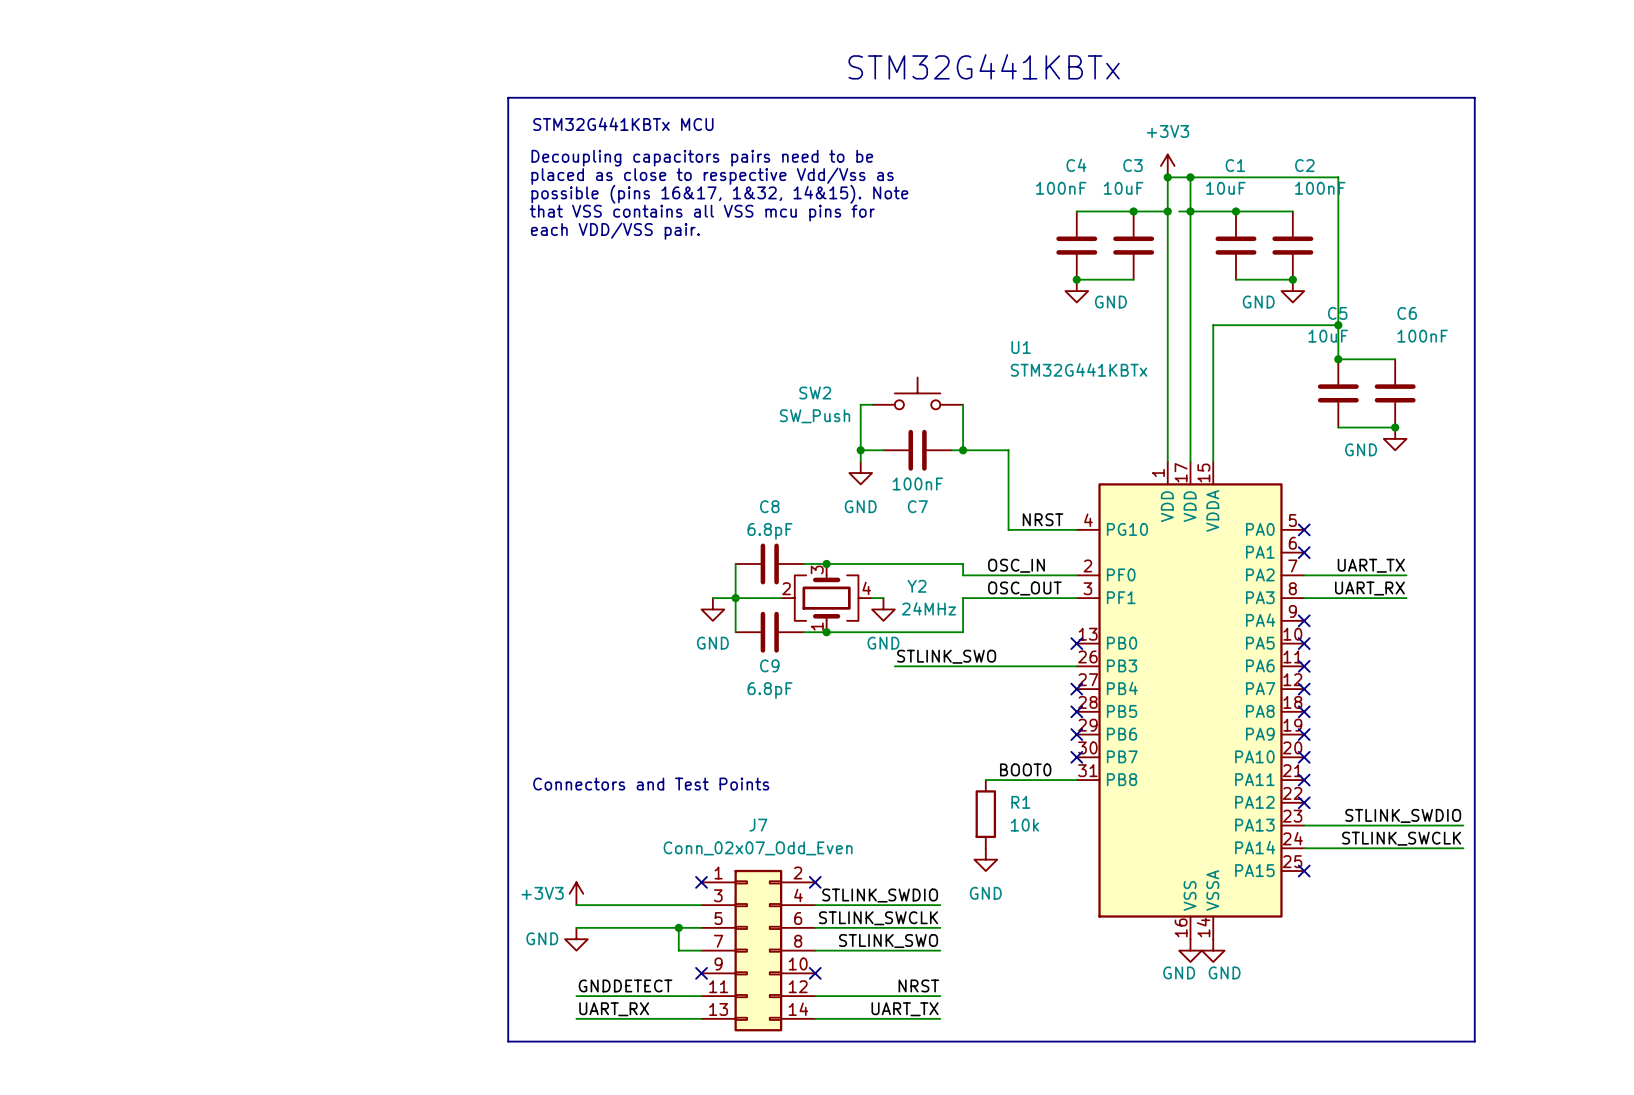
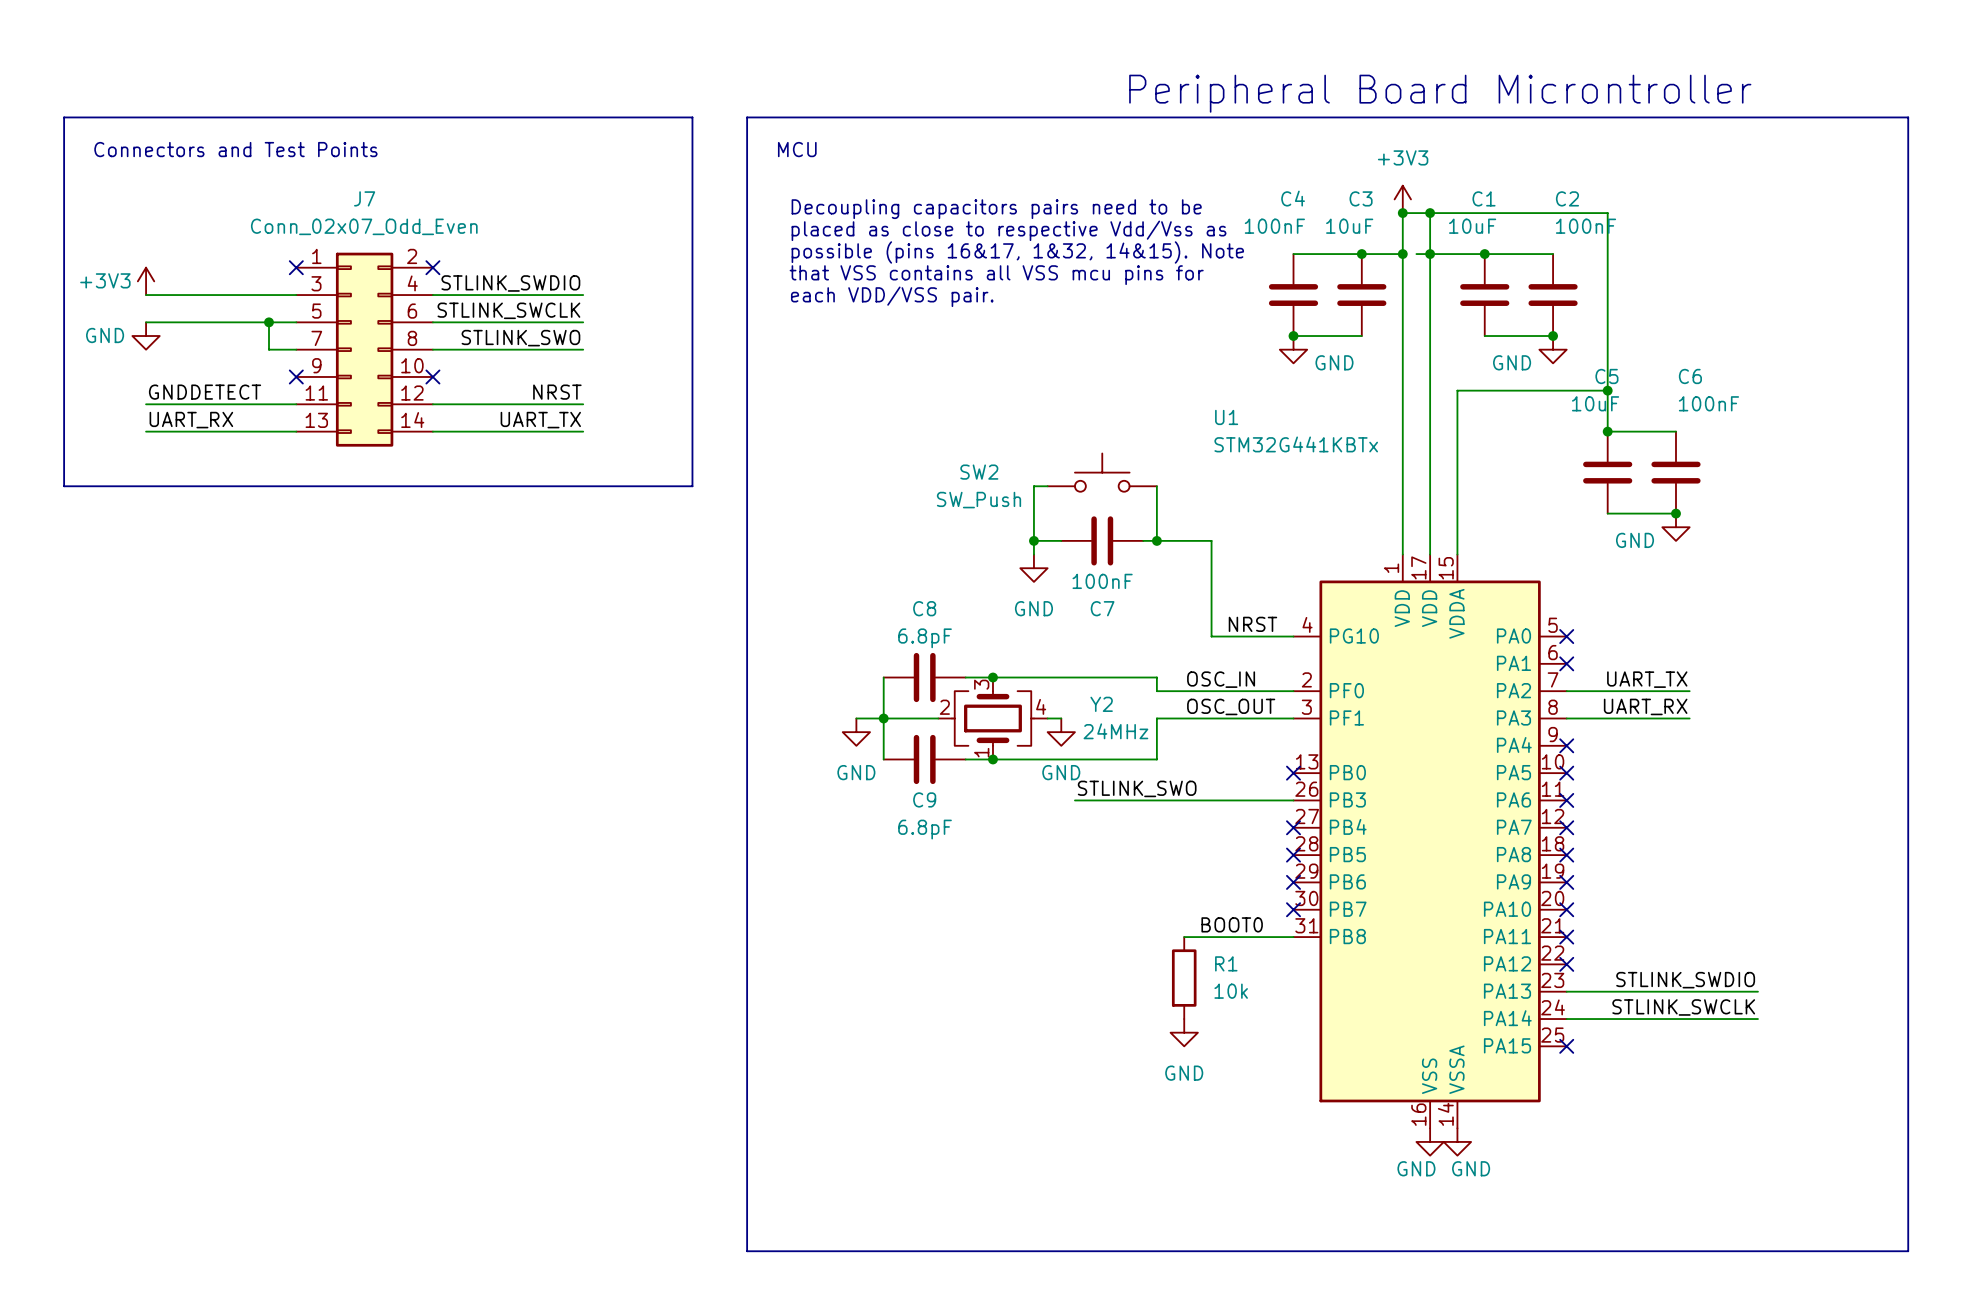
text: STM32G441KBTx (984, 66) -> none
text: none -> Peripheral Board Microntroller (1440, 93)
line: (508, 97) (508, 1041) (621, 1041) -> (747, 117) (747, 1251)
line: (576, 97) (621, 97) -> (692, 117) (692, 486) (64, 486) (64, 117) (610, 117)
line: (1474, 97) (1474, 1041) -> (1771, 117) (1908, 117) (1908, 1251) (1771, 1251)
text: none -> Connectors and Test Points (235, 149)
text: STM32G441KBTx MCU (623, 124) -> none
text: none -> MCU (797, 149)
text position: Decoupling capacitors pairs need to be (702, 158) -> Decoupling capacitors pairs need to be (996, 209)
text position: placed as close to respective Vdd/Vss as (712, 176) -> placed as close to respective Vdd/Vss as (1009, 230)
text position: possible (pins 16&17, 1&32, 14&15). Note (719, 194) -> possible (pins 16&17, 1&32, 14&15). Note (1017, 252)
text position: that VSS contains all VSS mcu pins for (702, 213) -> that VSS contains all VSS mcu pins for (996, 275)
no-connect mark: none -> (296, 267)
no-connect mark: none -> (432, 267)
text position: each VDD/VSS pair. (615, 231) -> each VDD/VSS pair. (892, 296)
power symbol: none -> +3V3 (146, 281)
label: none -> STLINK_SWDIO (510, 283)
wire: none -> (146, 295) (296, 295)
wire: none -> (432, 295) (583, 295)
label: none -> STLINK_SWCLK (508, 310)
wire: none -> (146, 322) (296, 322)
wire: none -> (268, 322) (268, 349) (296, 349)
junction: none -> (268, 322)
wire: none -> (432, 322) (583, 322)
power symbol: none -> GND (146, 336)
label: none -> STLINK_SWO (520, 338)
wire: none -> (432, 349) (583, 349)
no-connect mark: none -> (296, 376)
no-connect mark: none -> (432, 376)
label: none -> GNDDETECT (205, 392)
label: none -> NRST (557, 392)
wire: none -> (146, 404) (296, 404)
wire: none -> (432, 404) (583, 404)
label: none -> UART_RX (191, 420)
label: none -> UART_TX (540, 420)
wire: none -> (146, 431) (296, 431)
wire: none -> (432, 431) (583, 431)
text: Connectors and Test Points (651, 784) -> none
no-connect mark: (701, 882) -> none
no-connect mark: (815, 882) -> none
power symbol: +3V3 (576, 893) -> none
label: STLINK_SWDIO (880, 895) -> none
wire: (576, 905) (701, 905) -> none
wire: (815, 905) (940, 905) -> none
label: STLINK_SWCLK (878, 918) -> none
wire: (576, 927) (701, 927) -> none
wire: (678, 927) (678, 950) (701, 950) -> none
junction: (678, 927) -> none
wire: (815, 927) (940, 927) -> none
power symbol: GND (576, 939) -> none
label: STLINK_SWO (888, 941) -> none
J7 position: (758, 950) -> (364, 349)
wire: (815, 950) (940, 950) -> none
no-connect mark: (701, 973) -> none
no-connect mark: (815, 973) -> none
label: GNDDETECT (625, 985) -> none
label: NRST (918, 985) -> none
wire: (576, 996) (701, 996) -> none
wire: (815, 996) (940, 996) -> none
label: UART_RX (614, 1009) -> none
label: UART_TX (905, 1009) -> none
wire: (576, 1018) (701, 1018) -> none
wire: (815, 1018) (940, 1018) -> none

